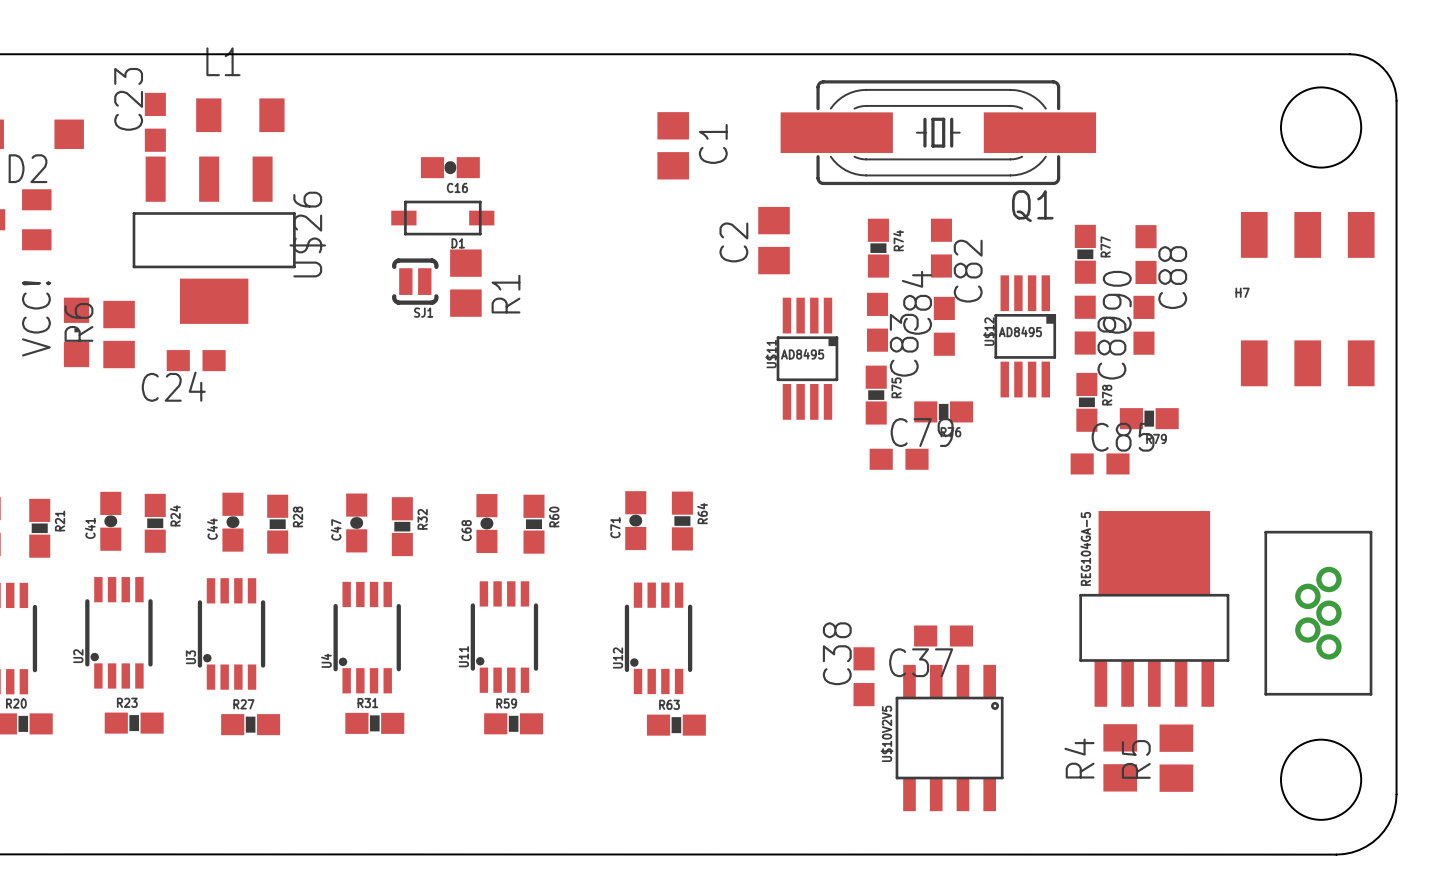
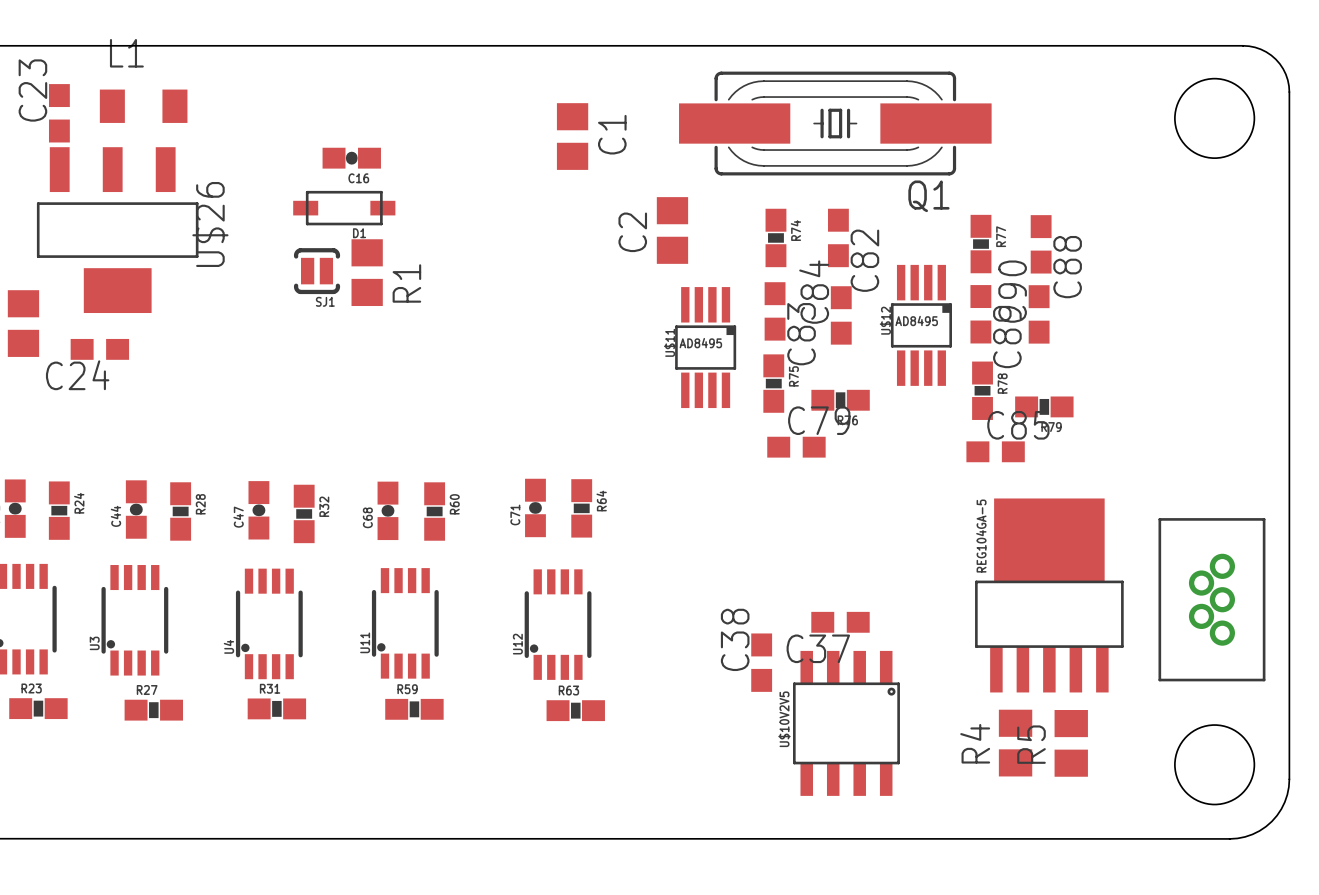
H7: (1307, 299) -> none

